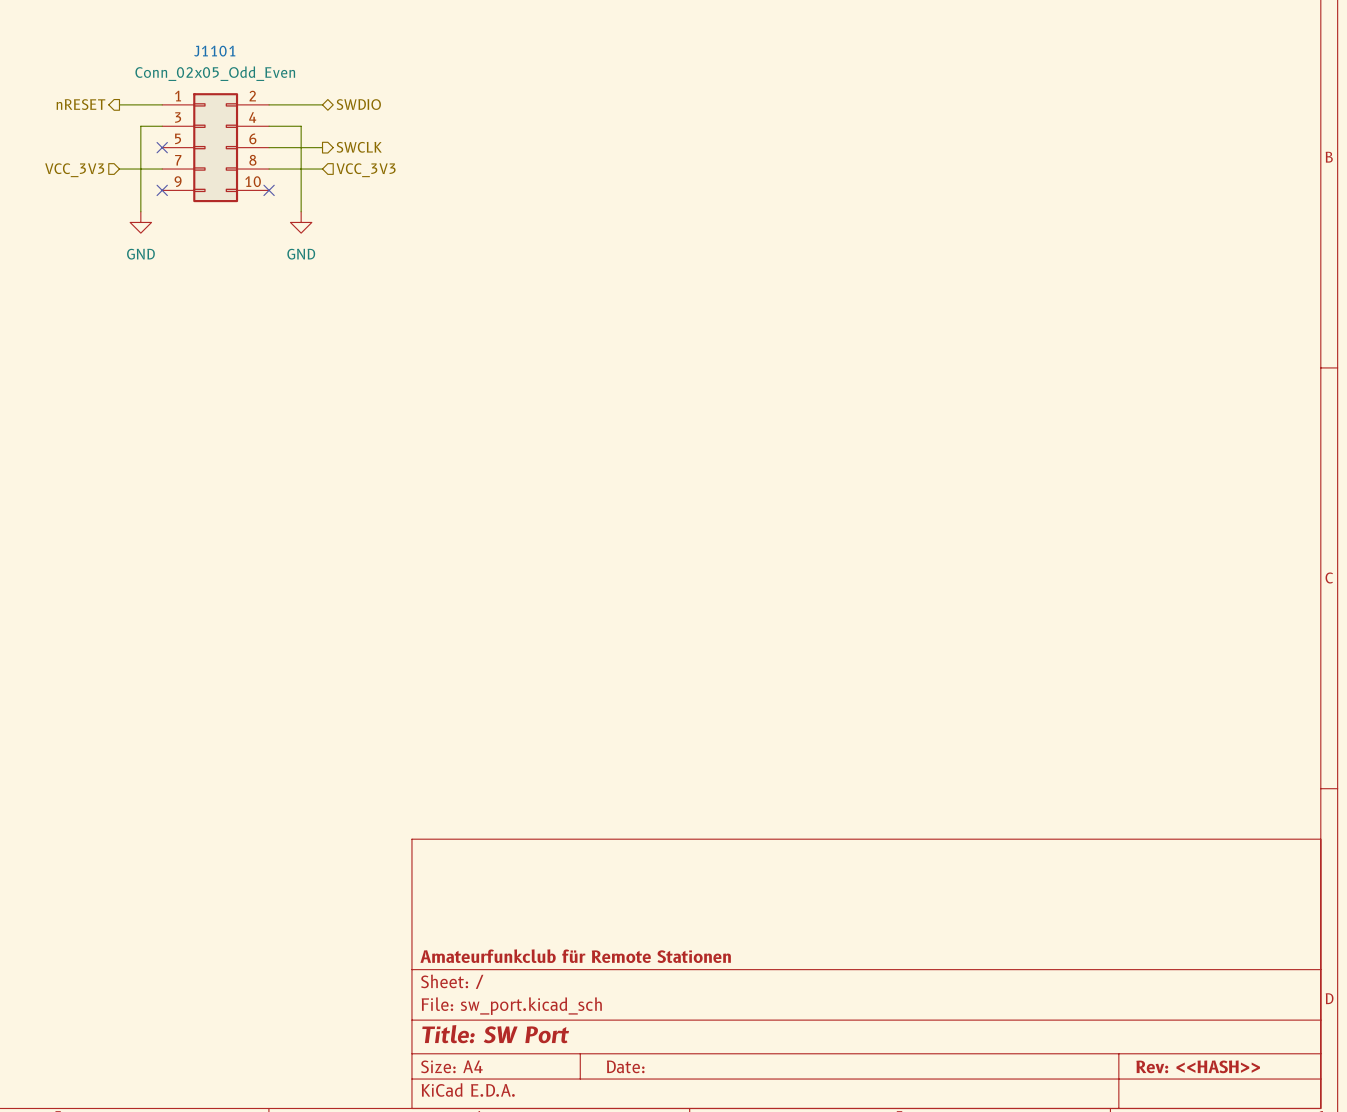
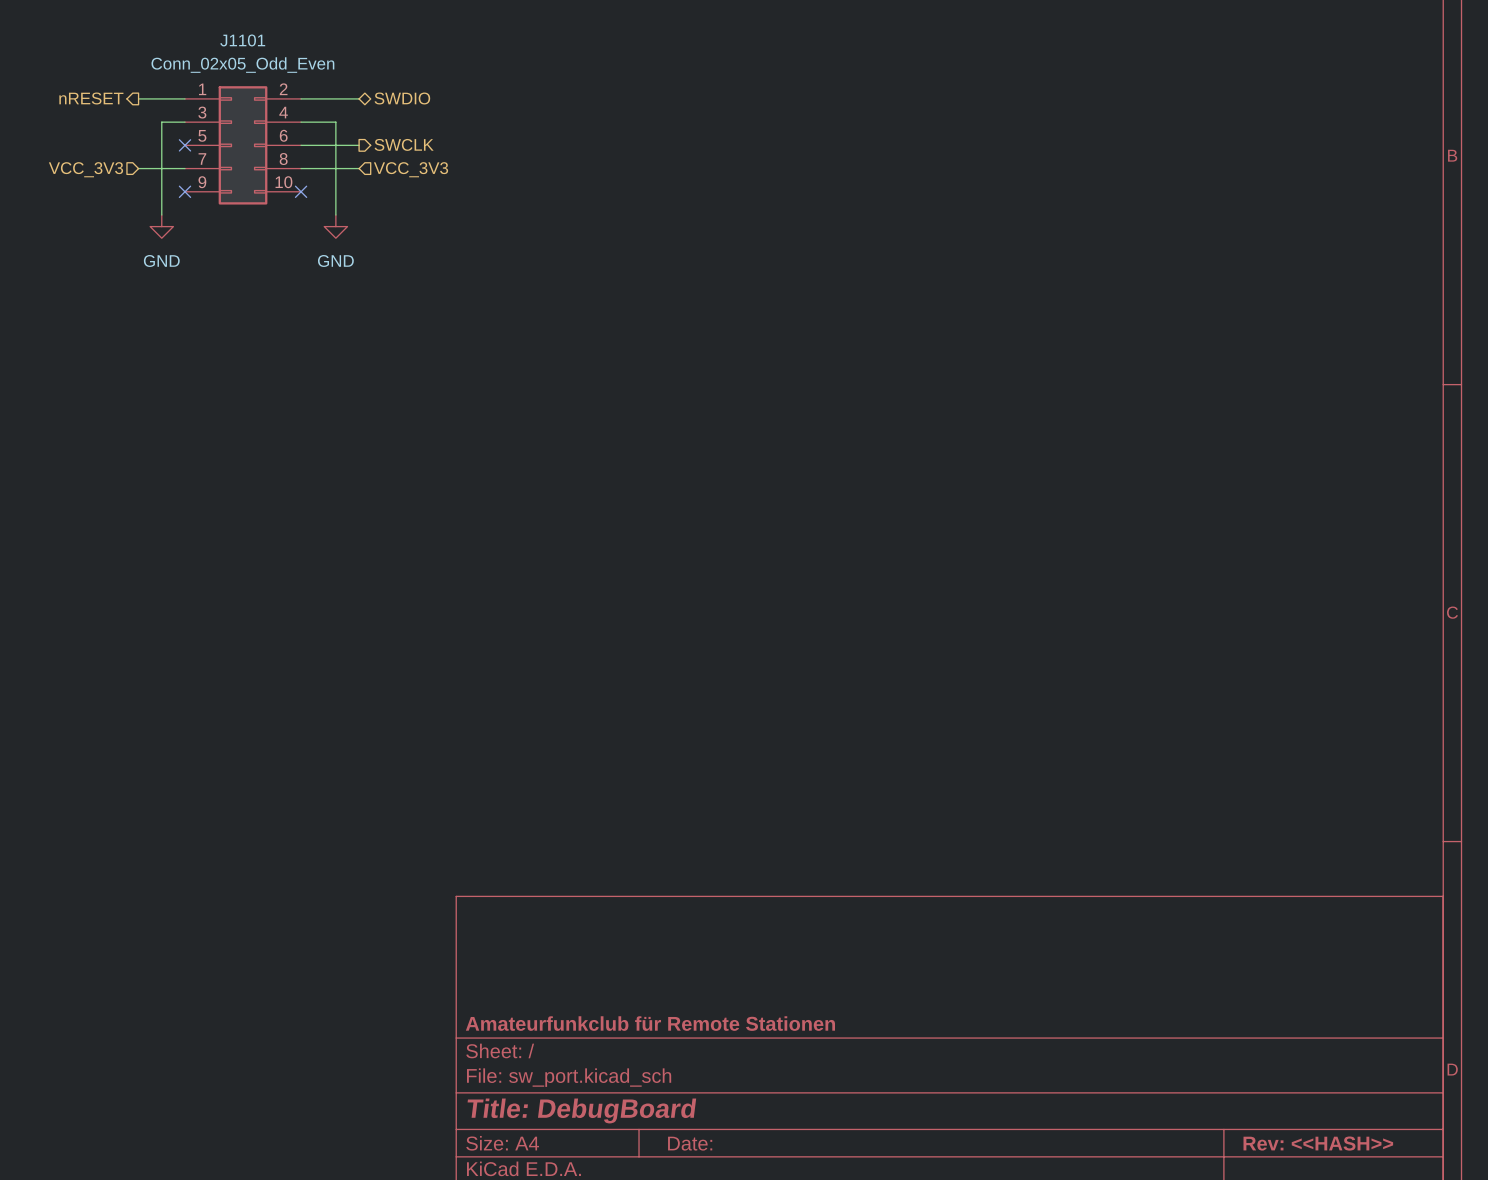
title block: Title: SW Port (495, 1034) -> Title: DebugBoard (581, 1110)

